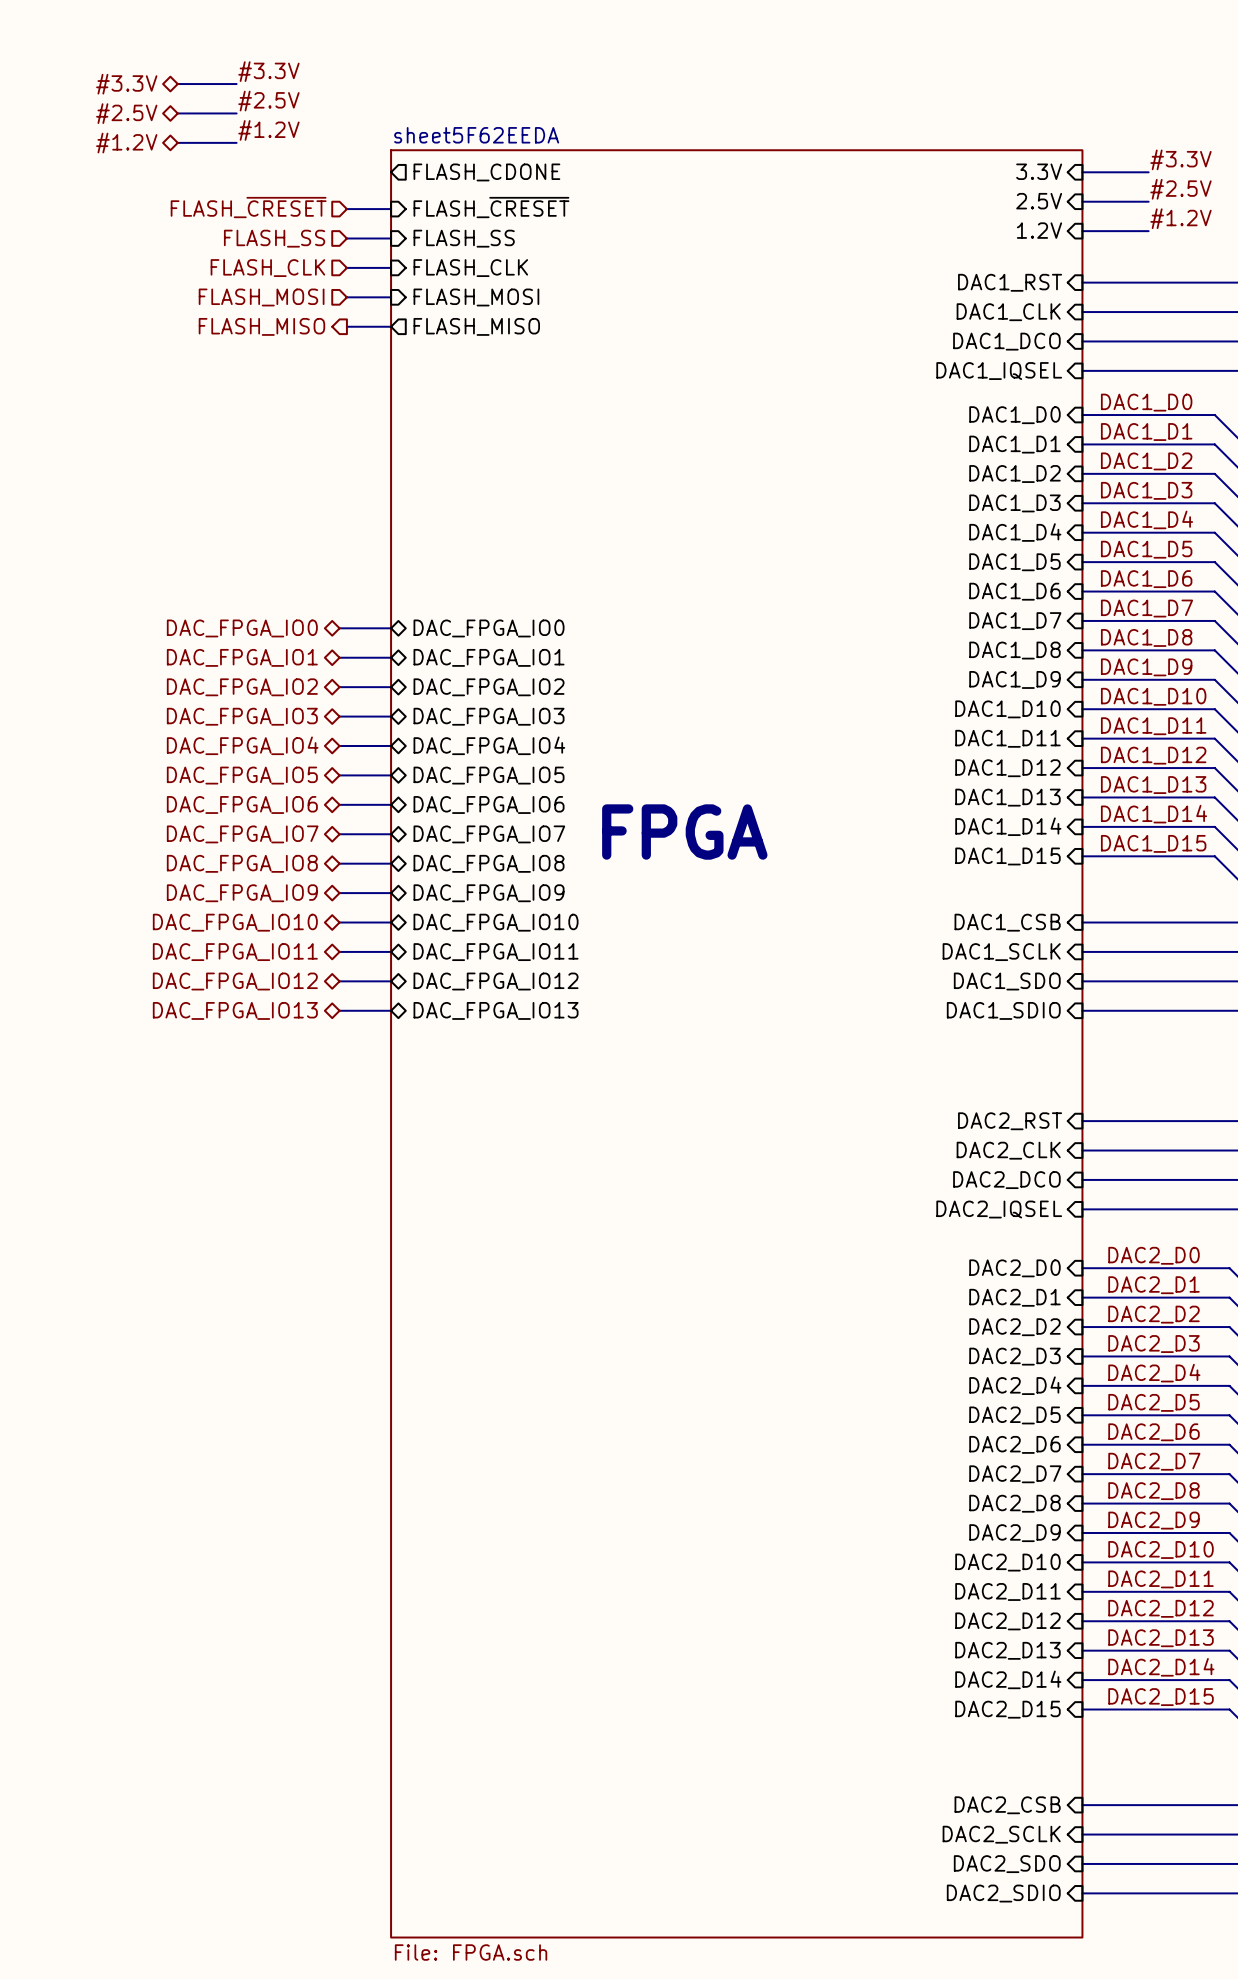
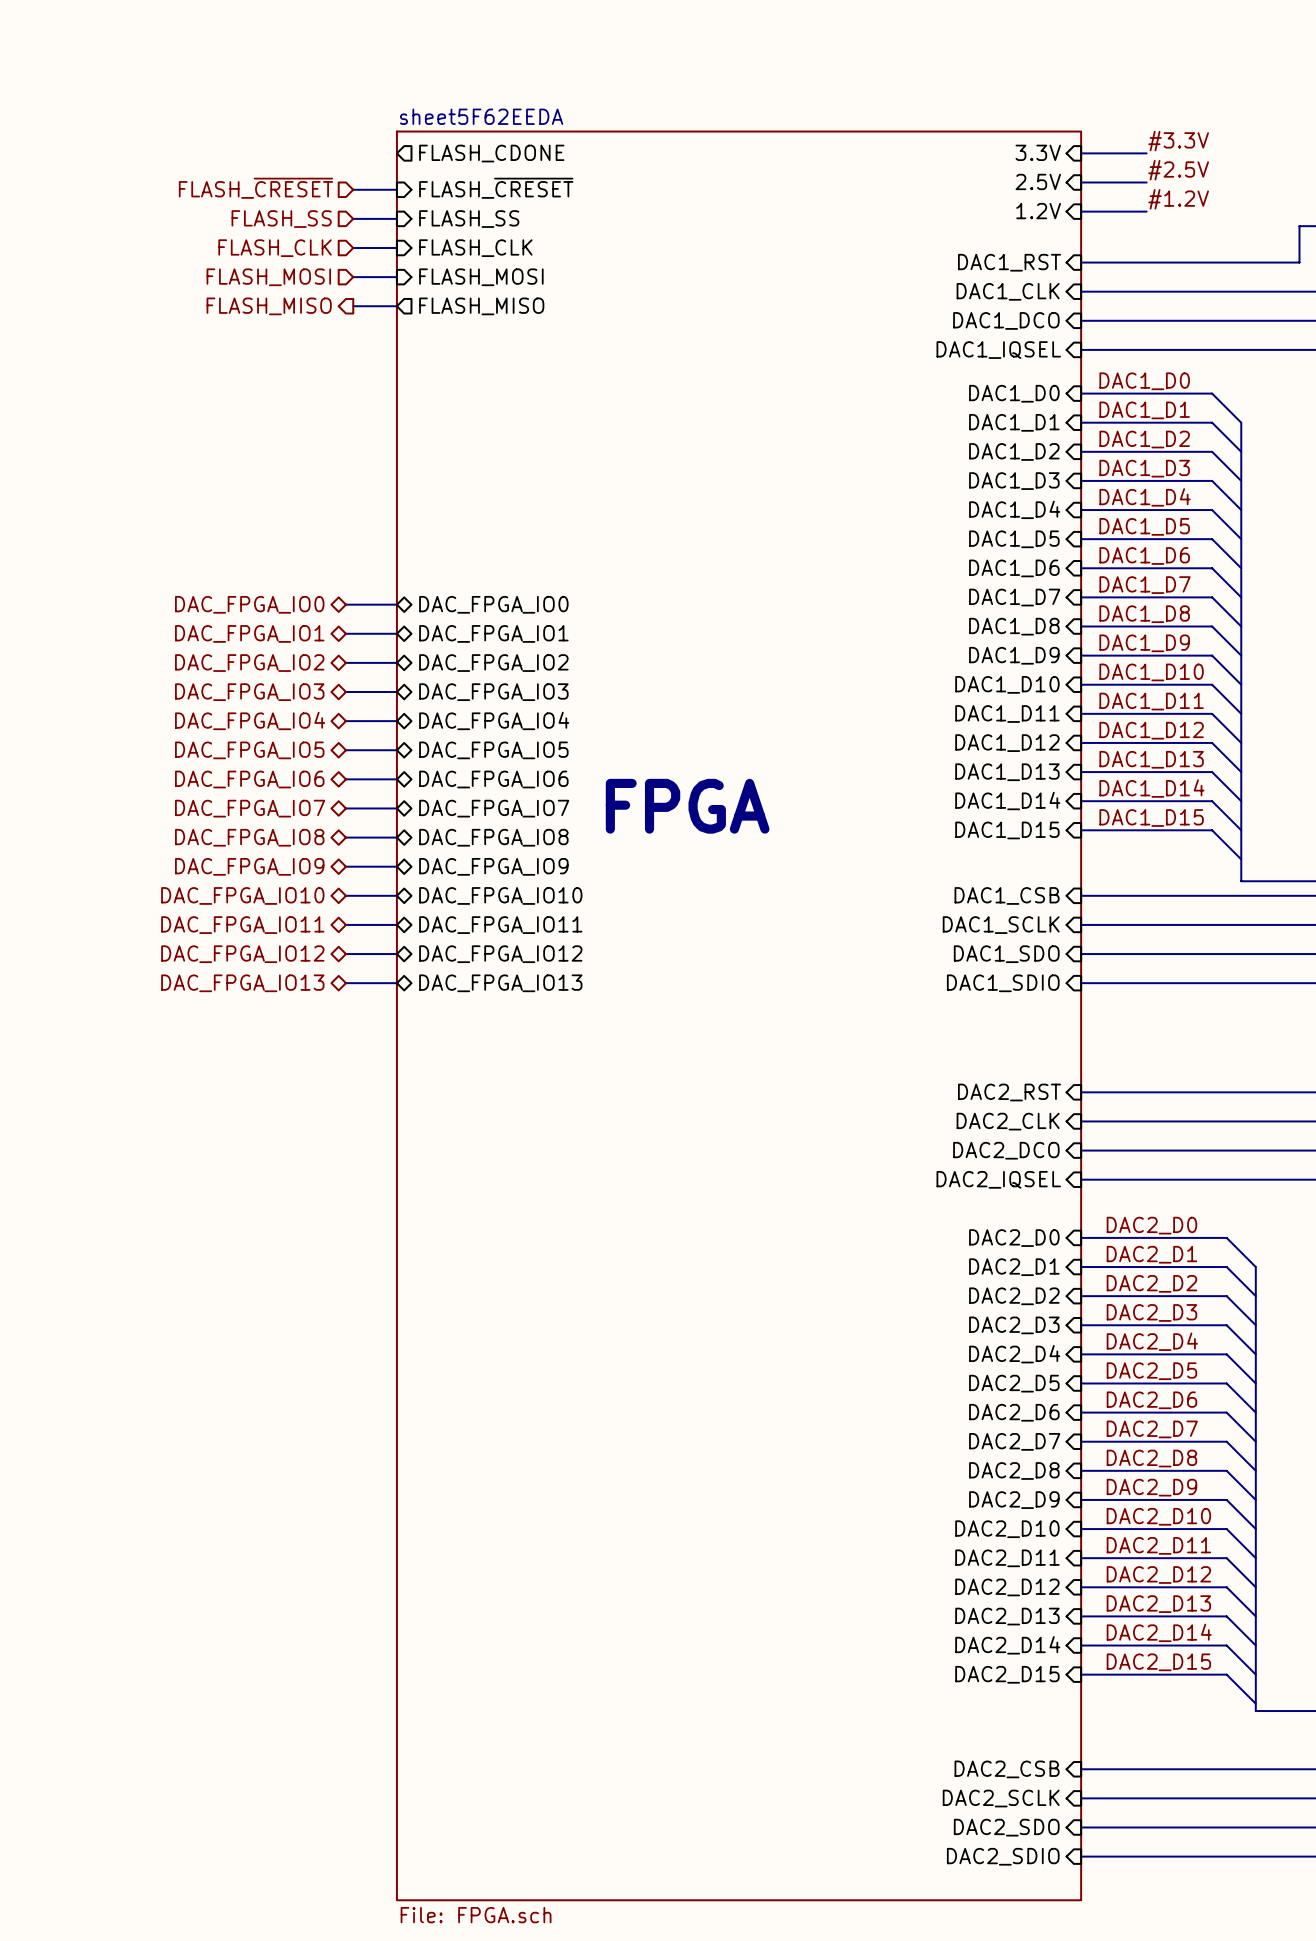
label: #3.3V (268, 71) -> none
hierarchical label: #3.3V (126, 84) -> none
wire: (177, 84) (236, 84) -> none
label: #2.5V (268, 101) -> none
hierarchical label: #2.5V (126, 113) -> none
wire: (177, 113) (236, 113) -> none
label: #1.2V (268, 130) -> none
wire: (177, 142) (236, 142) -> none
hierarchical label: #1.2V (126, 143) -> none

